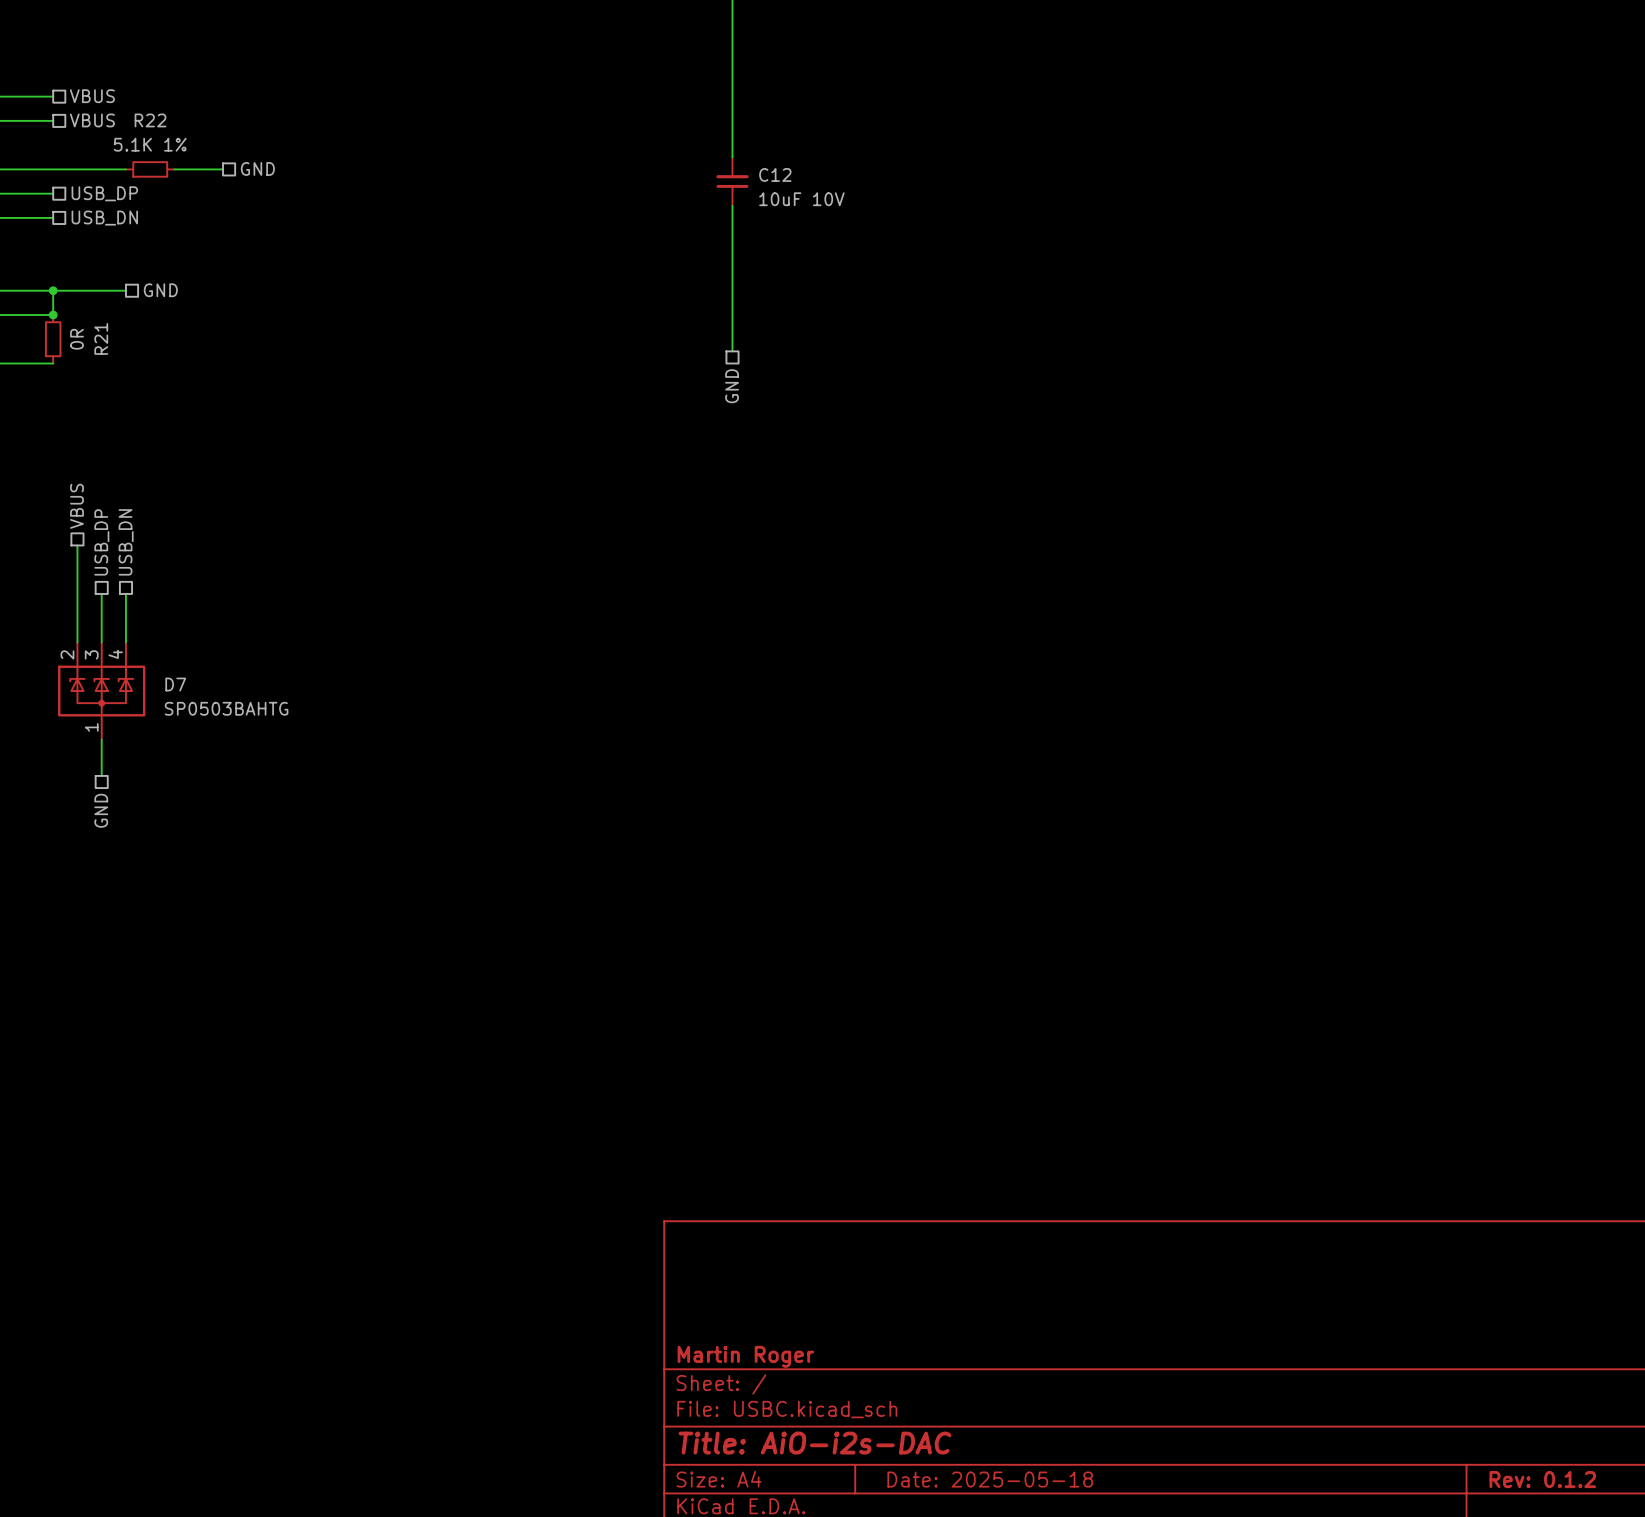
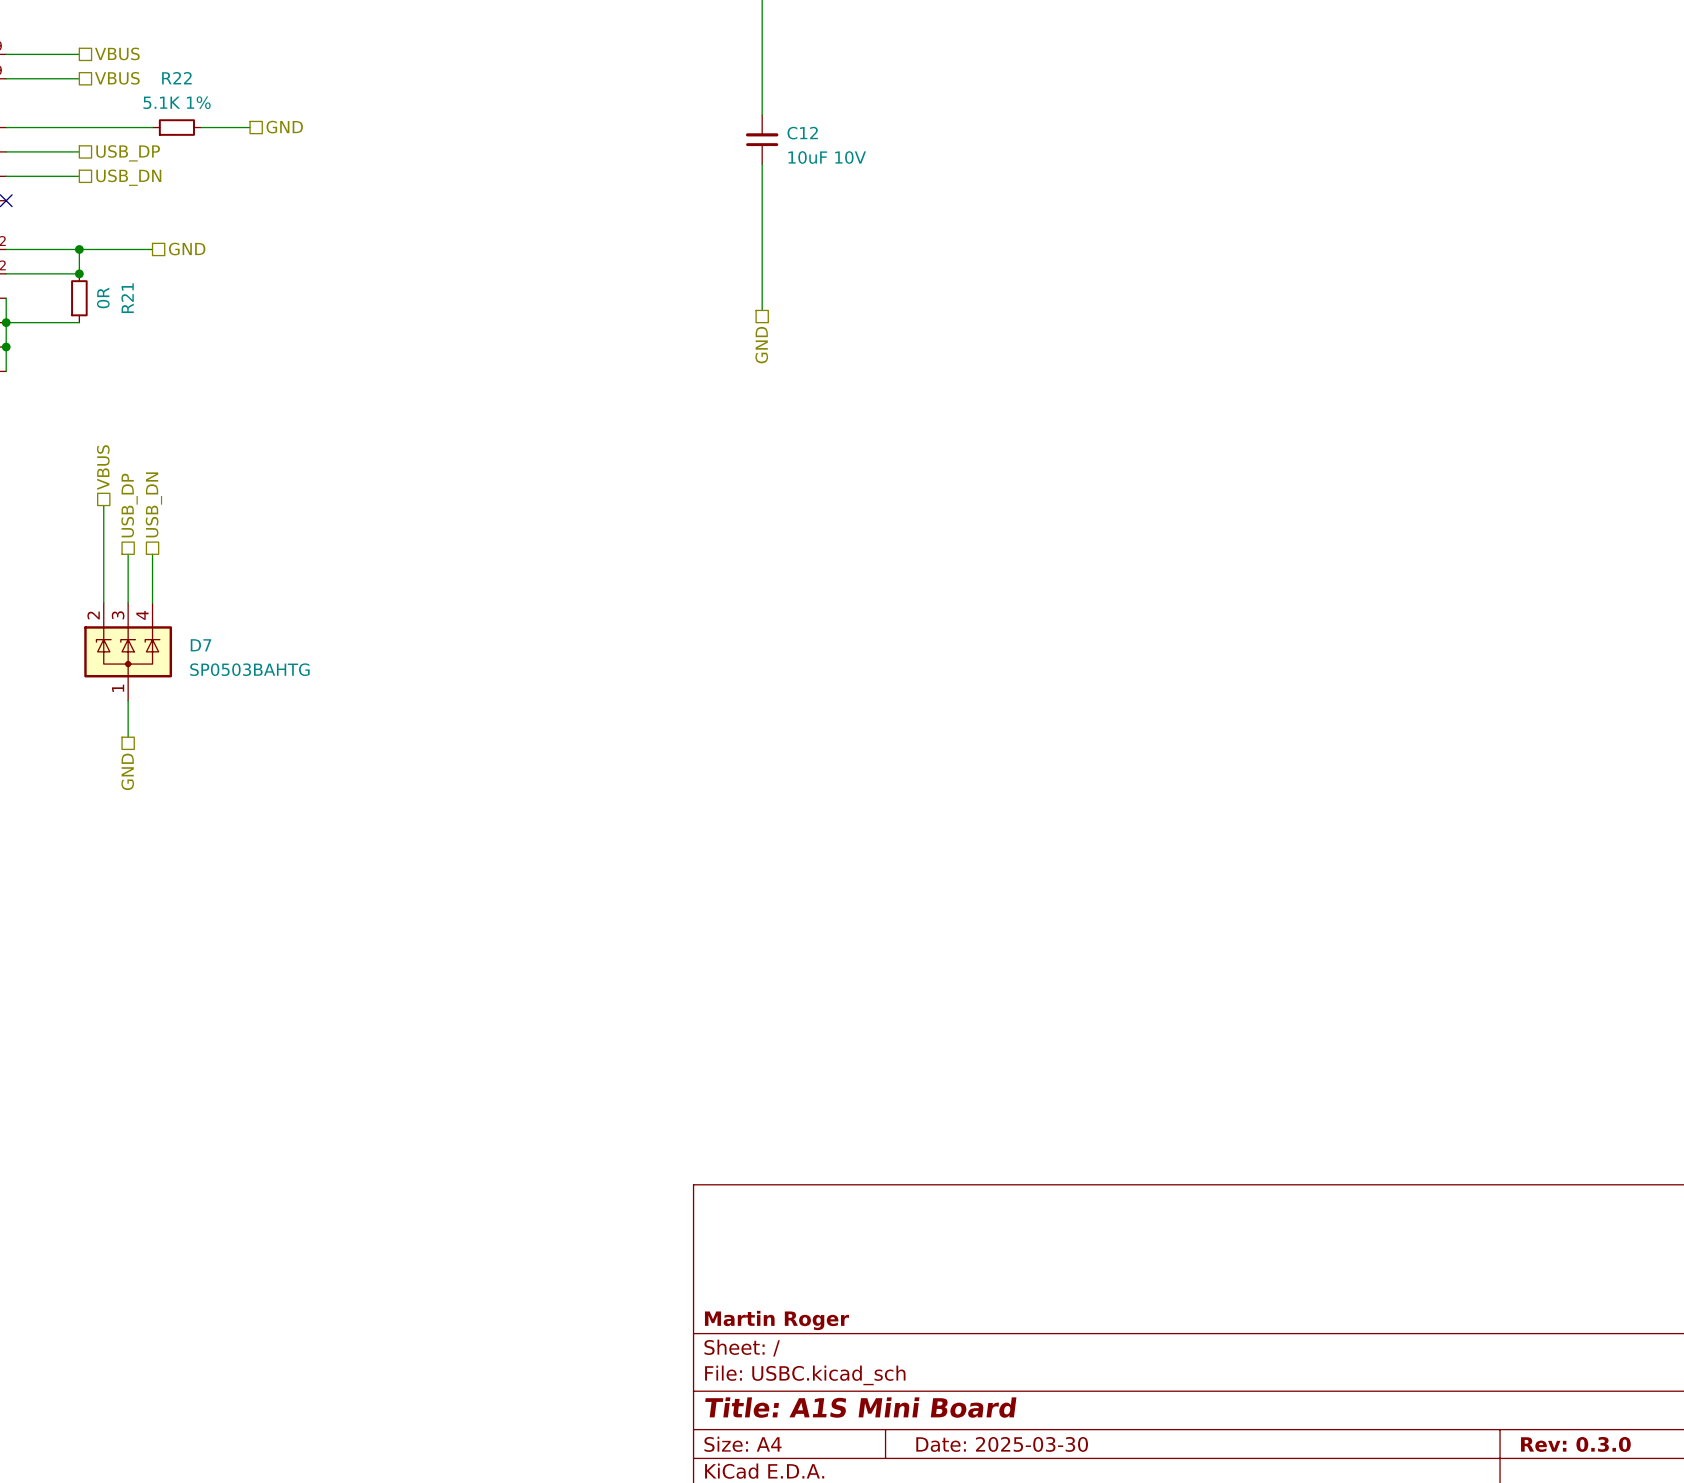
title block: Title: AiO-i2s-DAC (814, 1443) -> Title: A1S Mini Board (860, 1407)
title block: Date: 2025-05-18 (990, 1479) -> Date: 2025-03-30 (1002, 1444)
title block: Rev: 0.1.2 (1542, 1479) -> Rev: 0.3.0 (1575, 1444)

